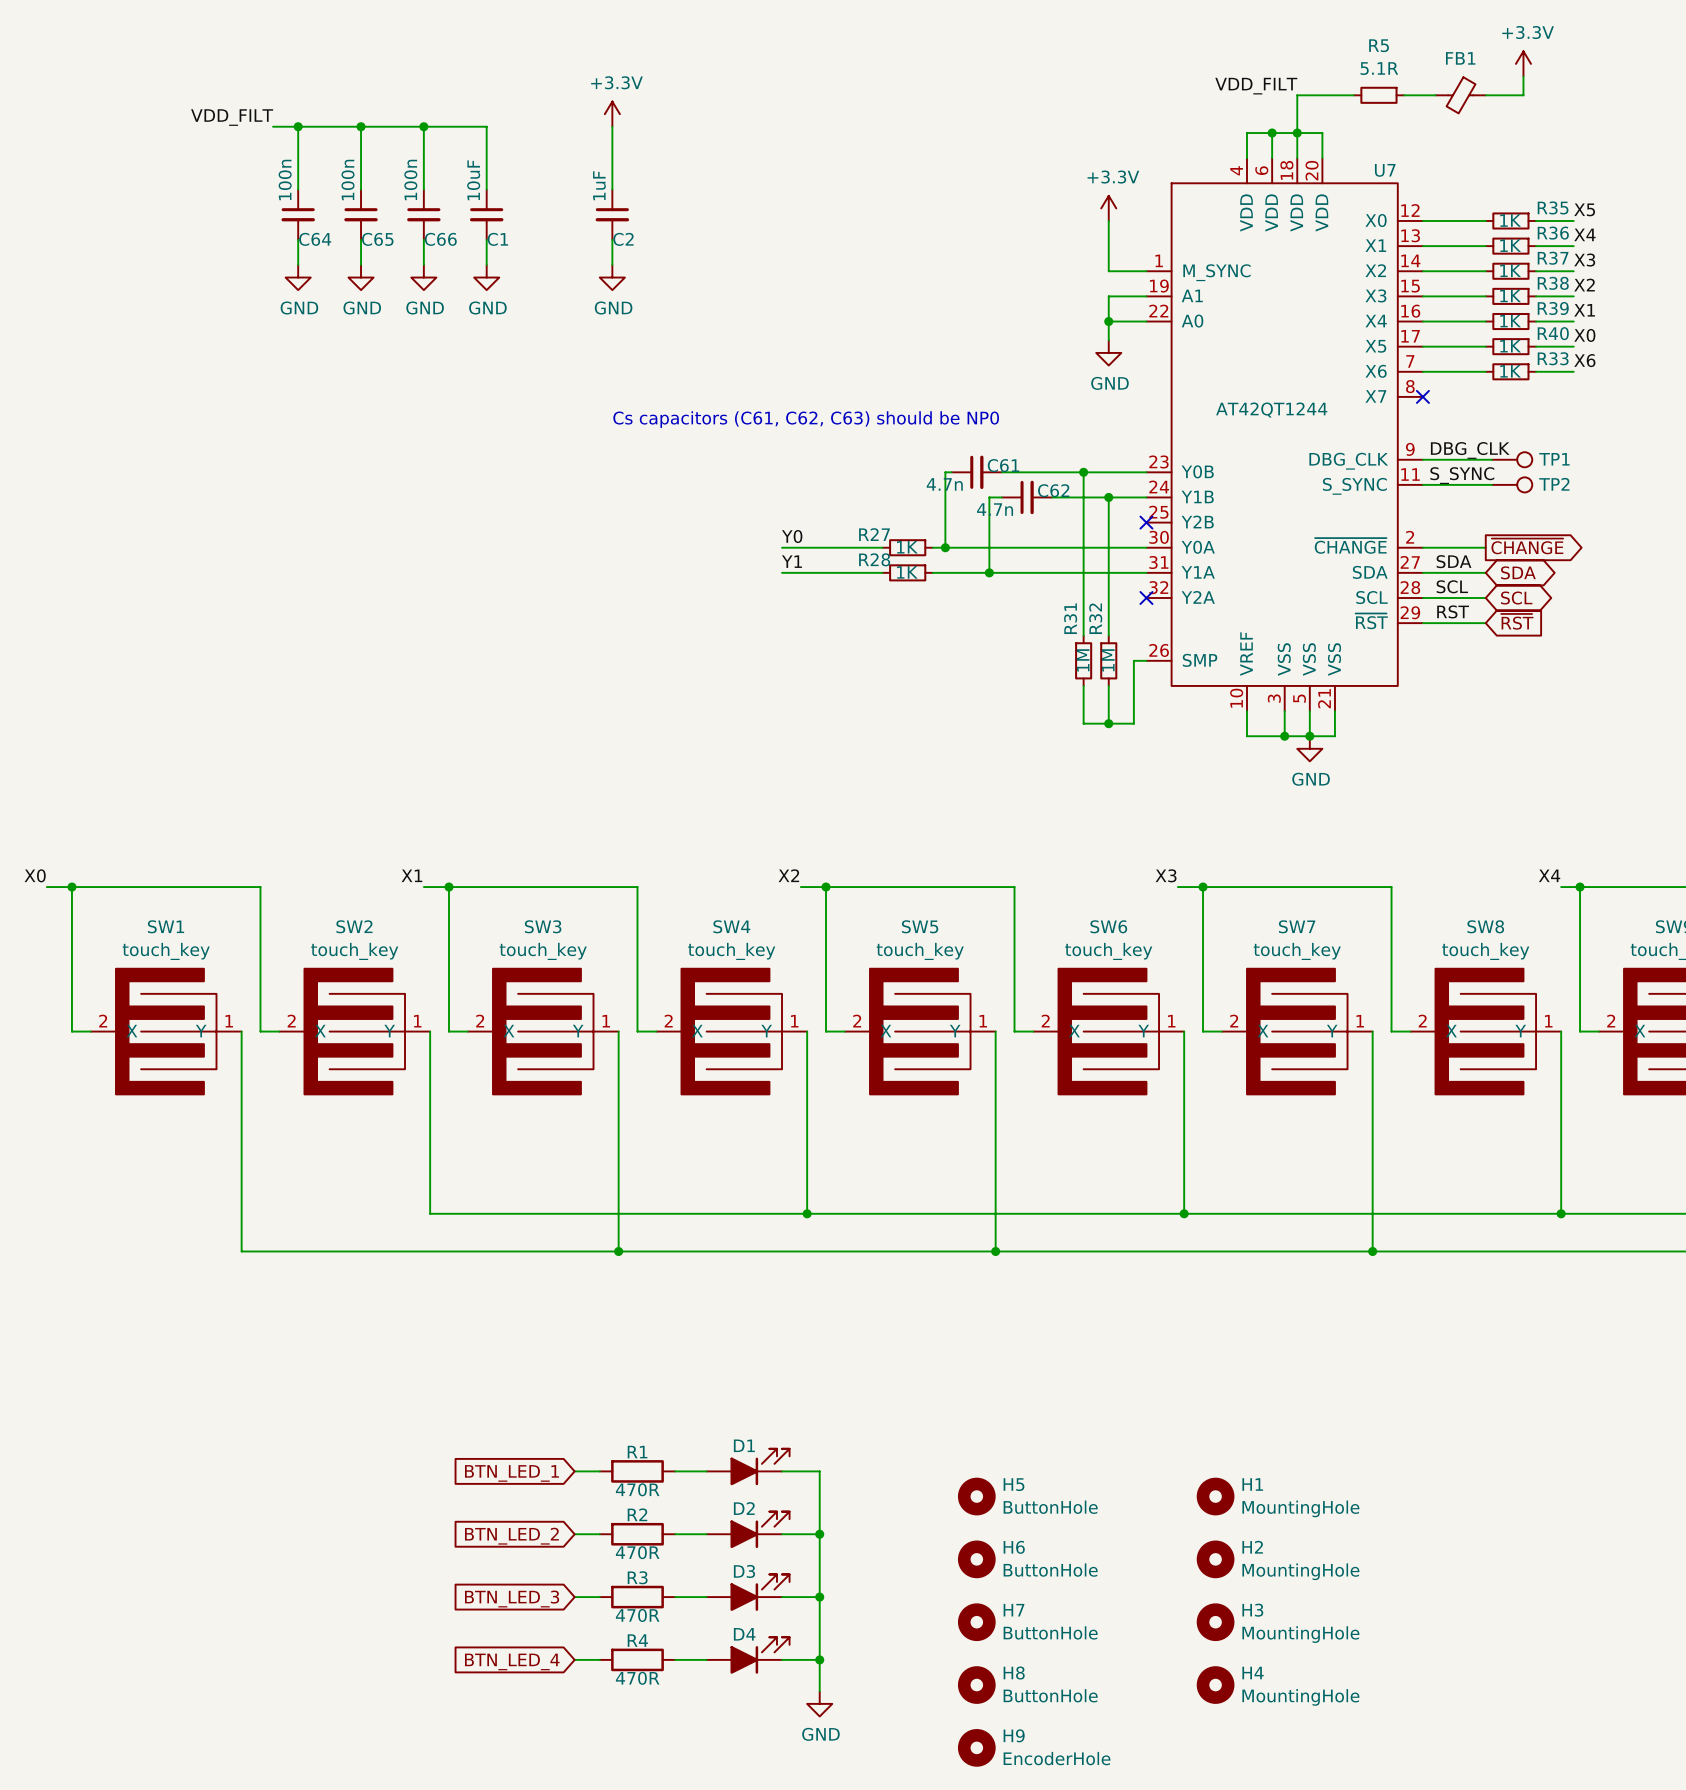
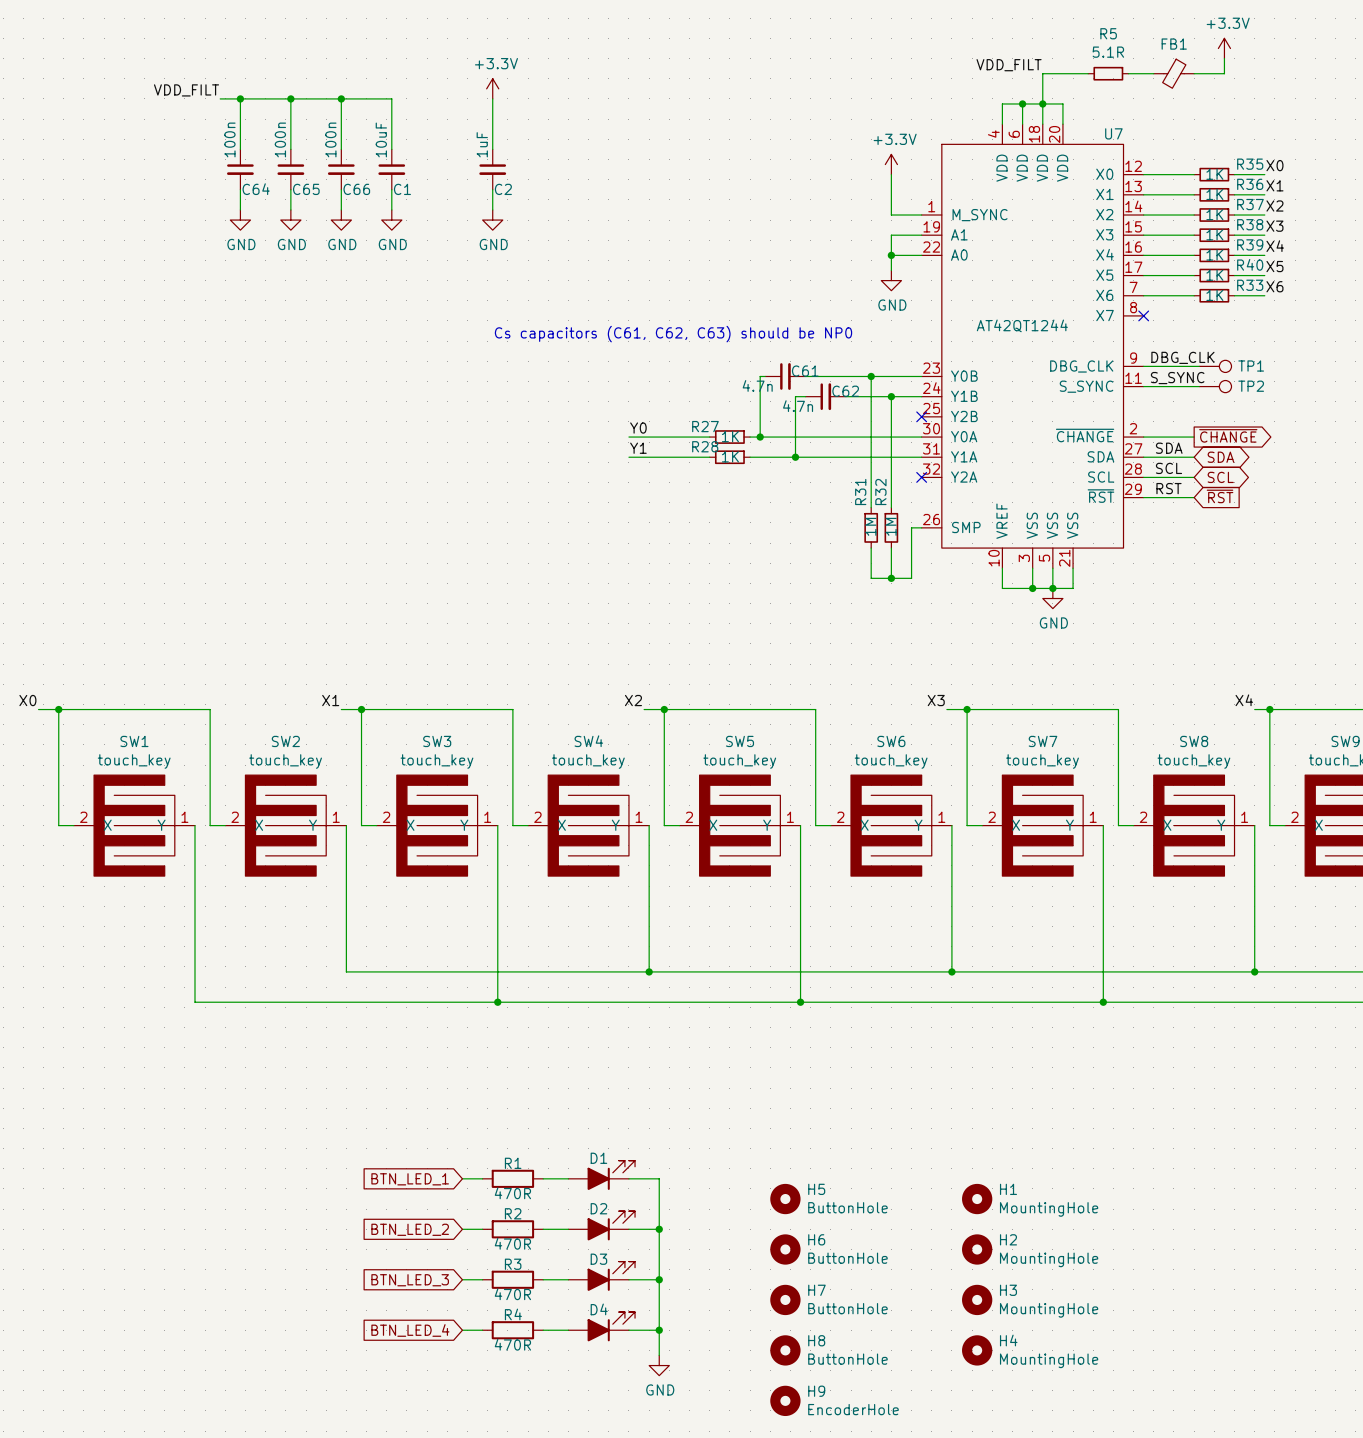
label: X5 (1584, 209) -> X0 (1274, 165)
label: X4 (1584, 234) -> X1 (1274, 185)
label: X3 (1584, 260) -> X2 (1274, 206)
label: X2 (1584, 285) -> X3 (1274, 226)
label: X1 (1584, 310) -> X4 (1275, 246)
label: X0 (1584, 335) -> X5 (1274, 266)

